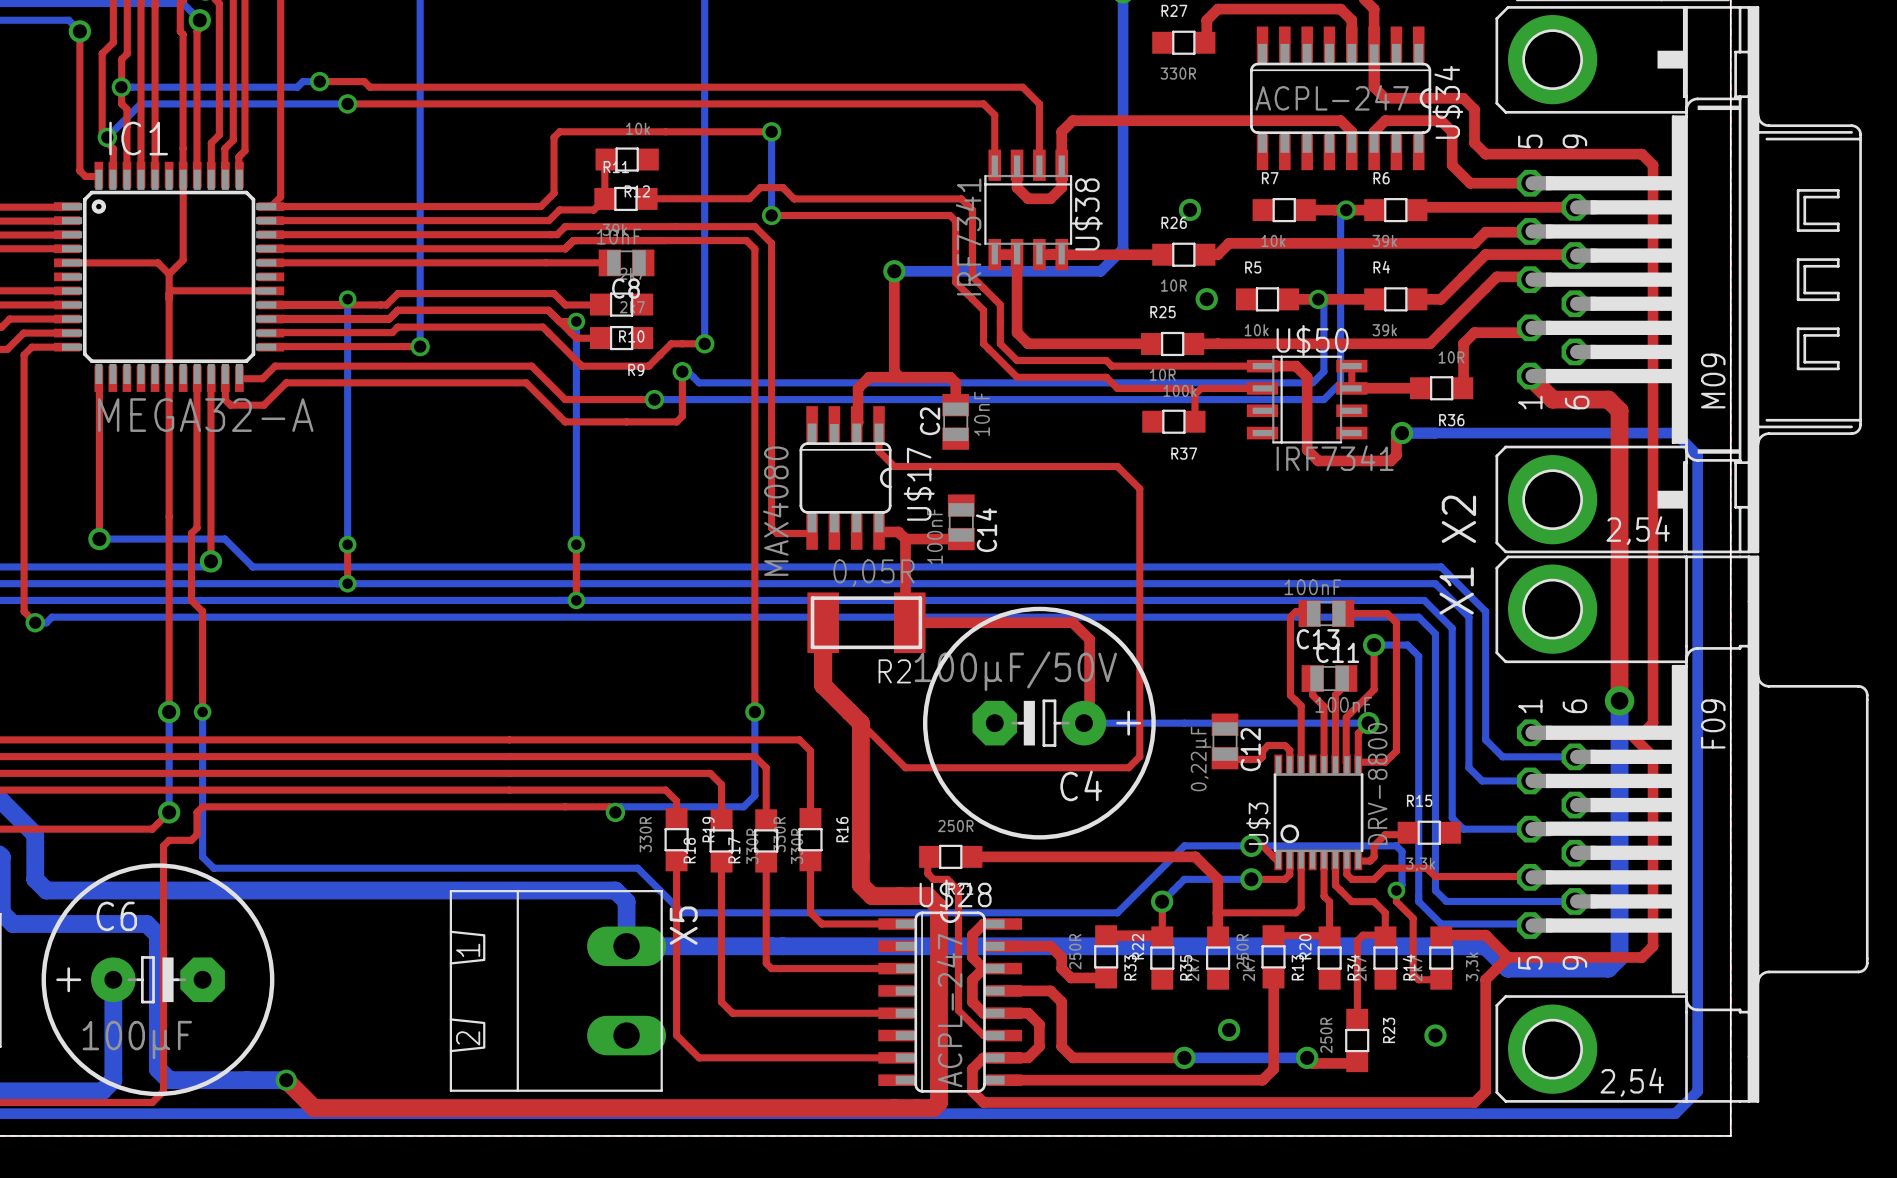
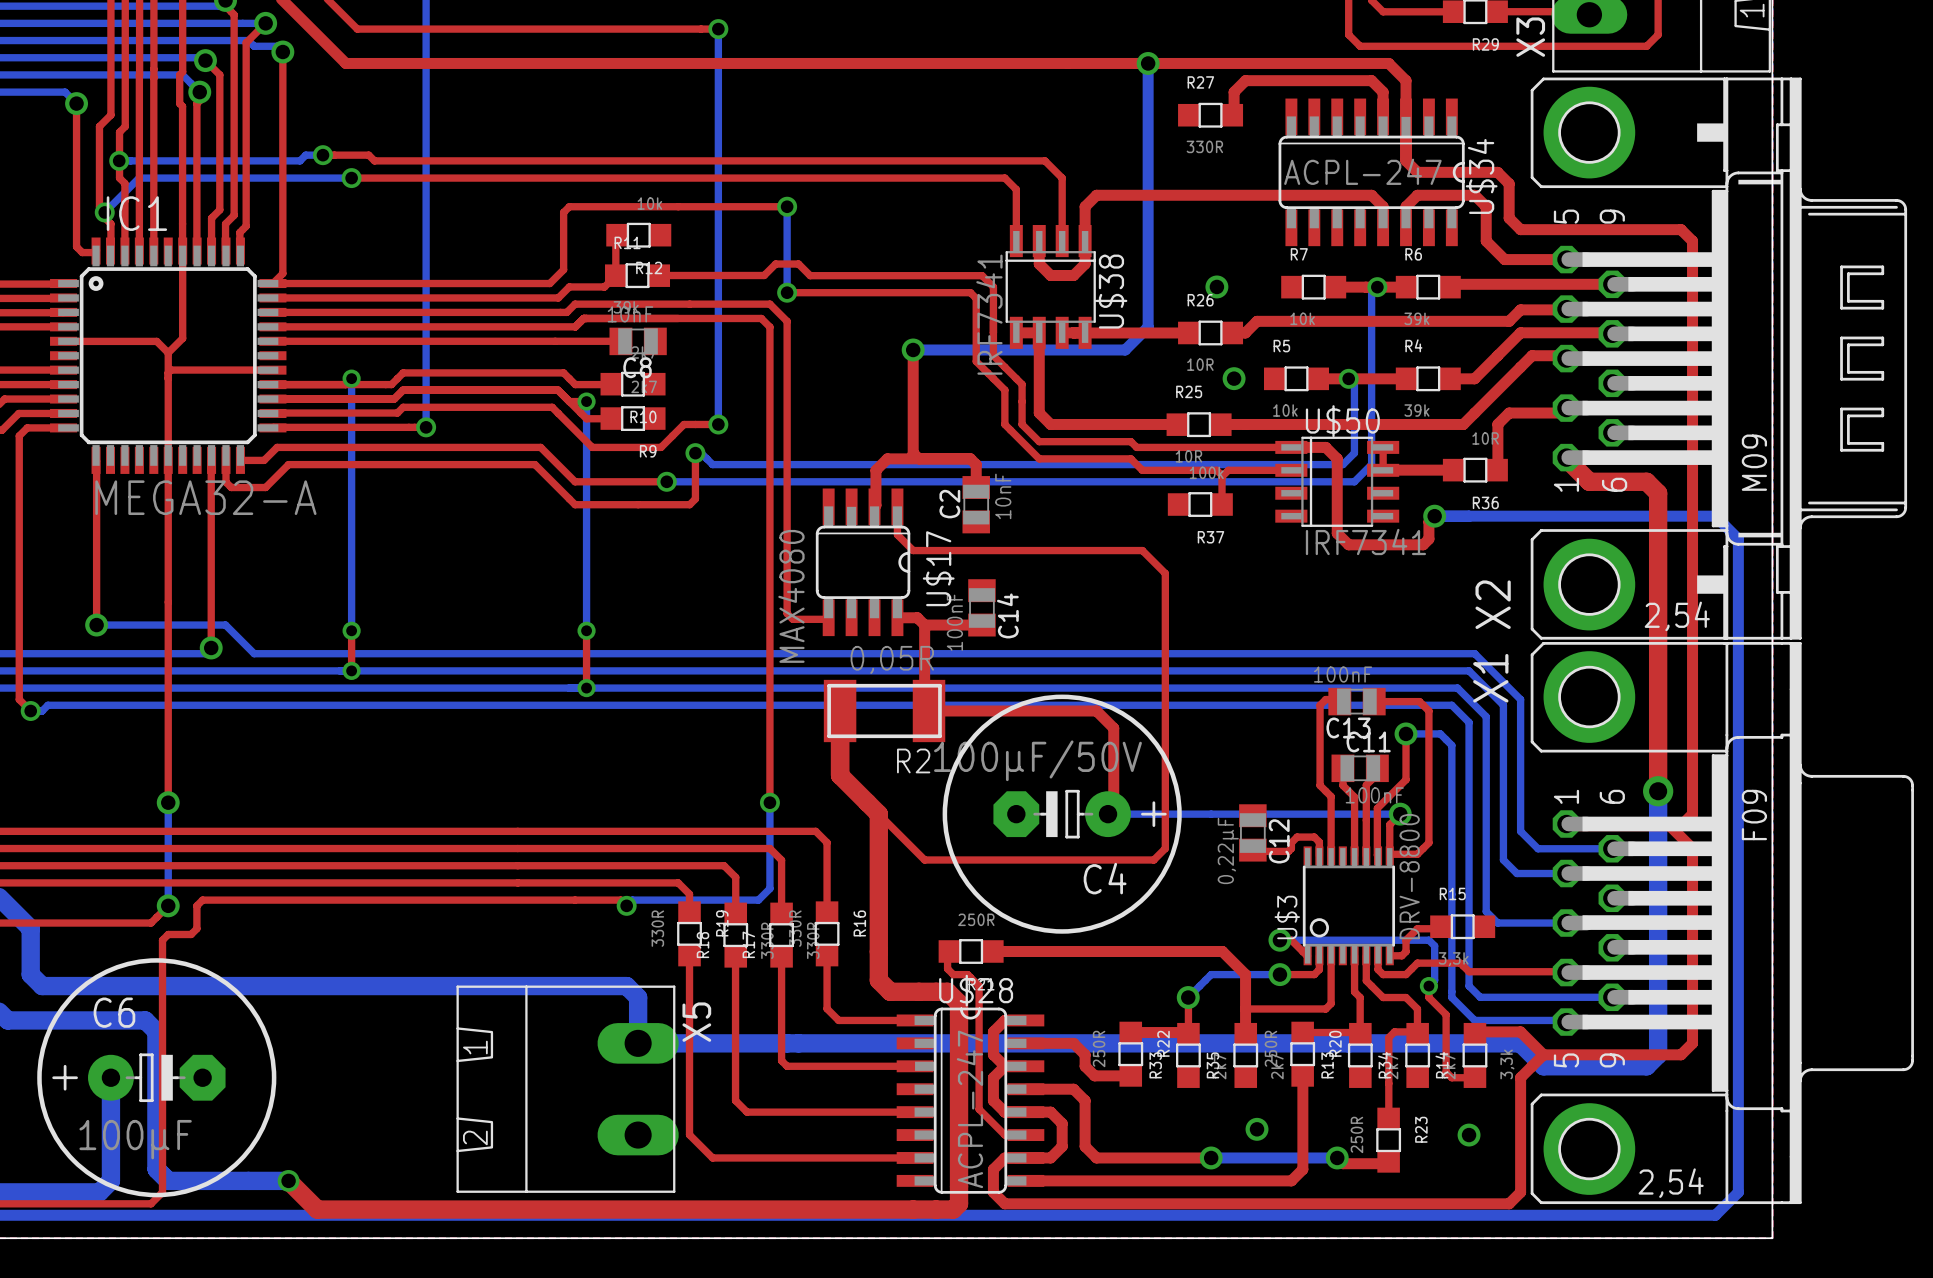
top track: (197, 378) (197, 527) (191, 533) (191, 600) (202, 611) (202, 712) -> none
bottom track: (202, 712) (202, 857) (213, 868) (637, 868) (682, 912) (1117, 912) (1184, 845) (1251, 845) -> none
via: (202, 712) -> none

